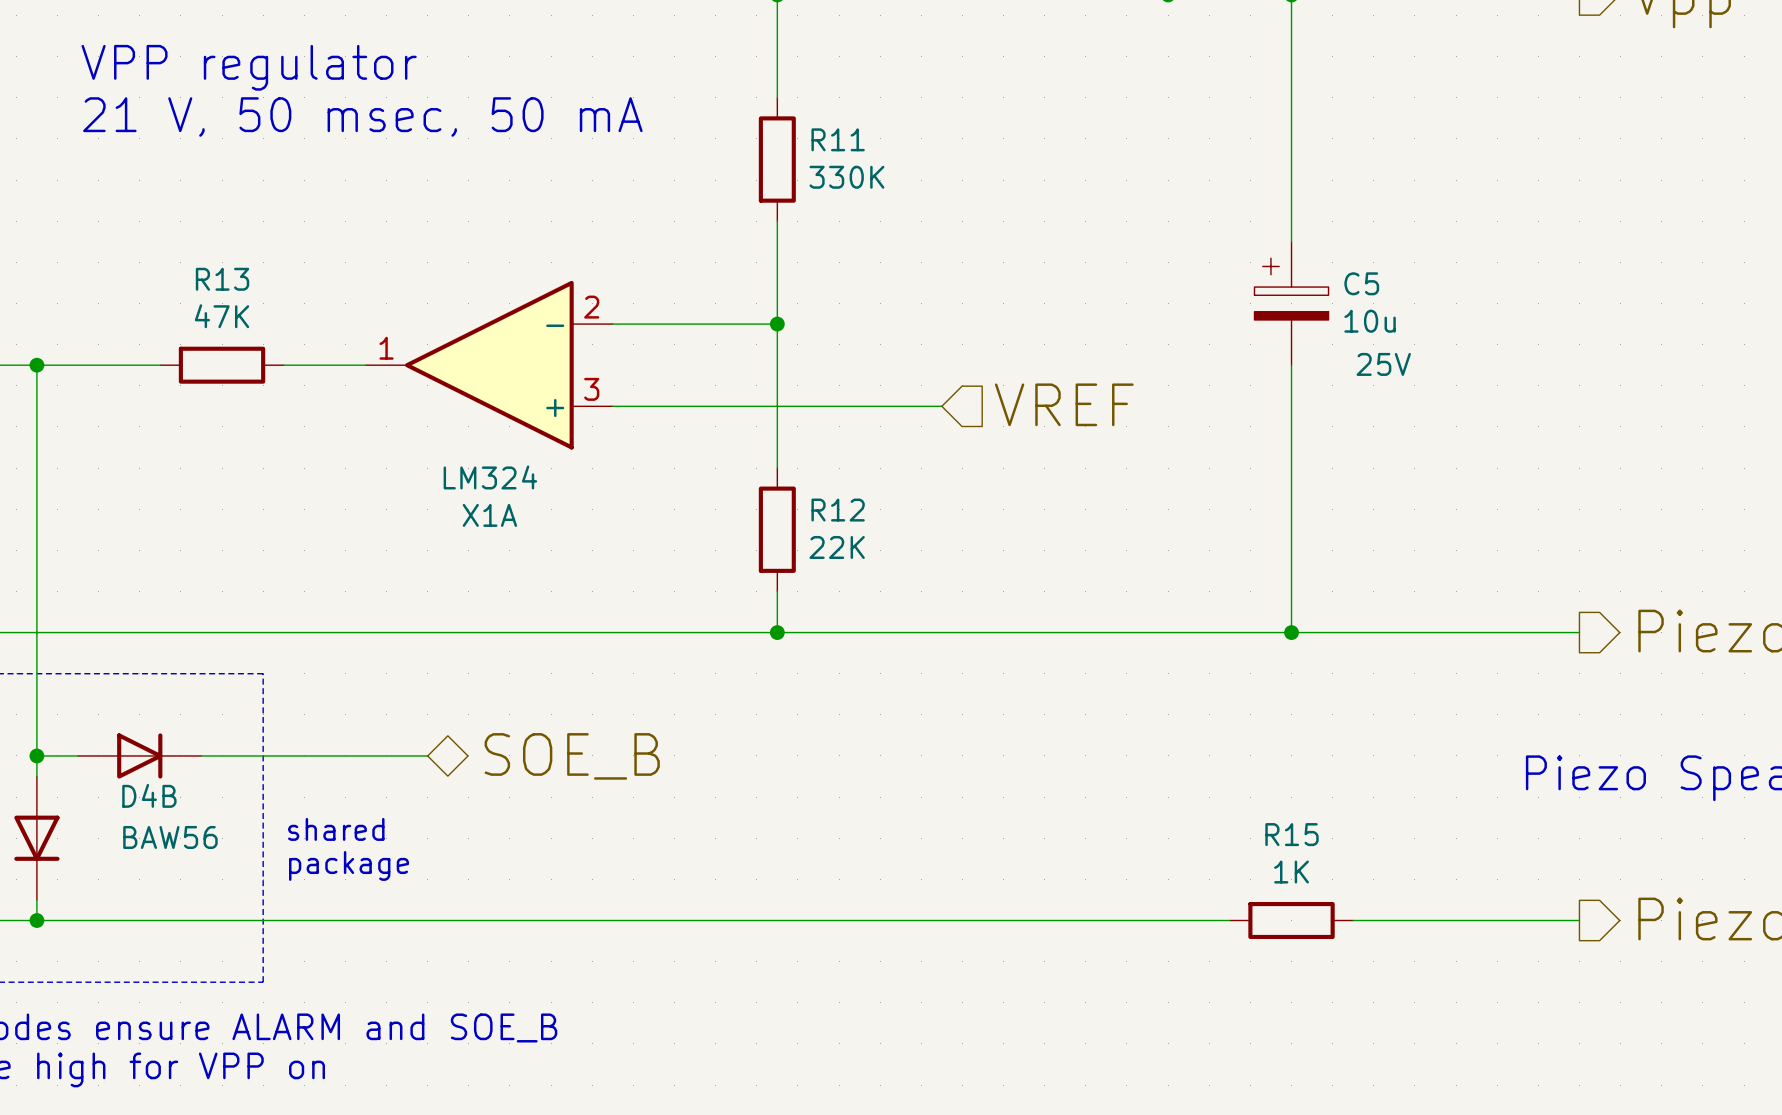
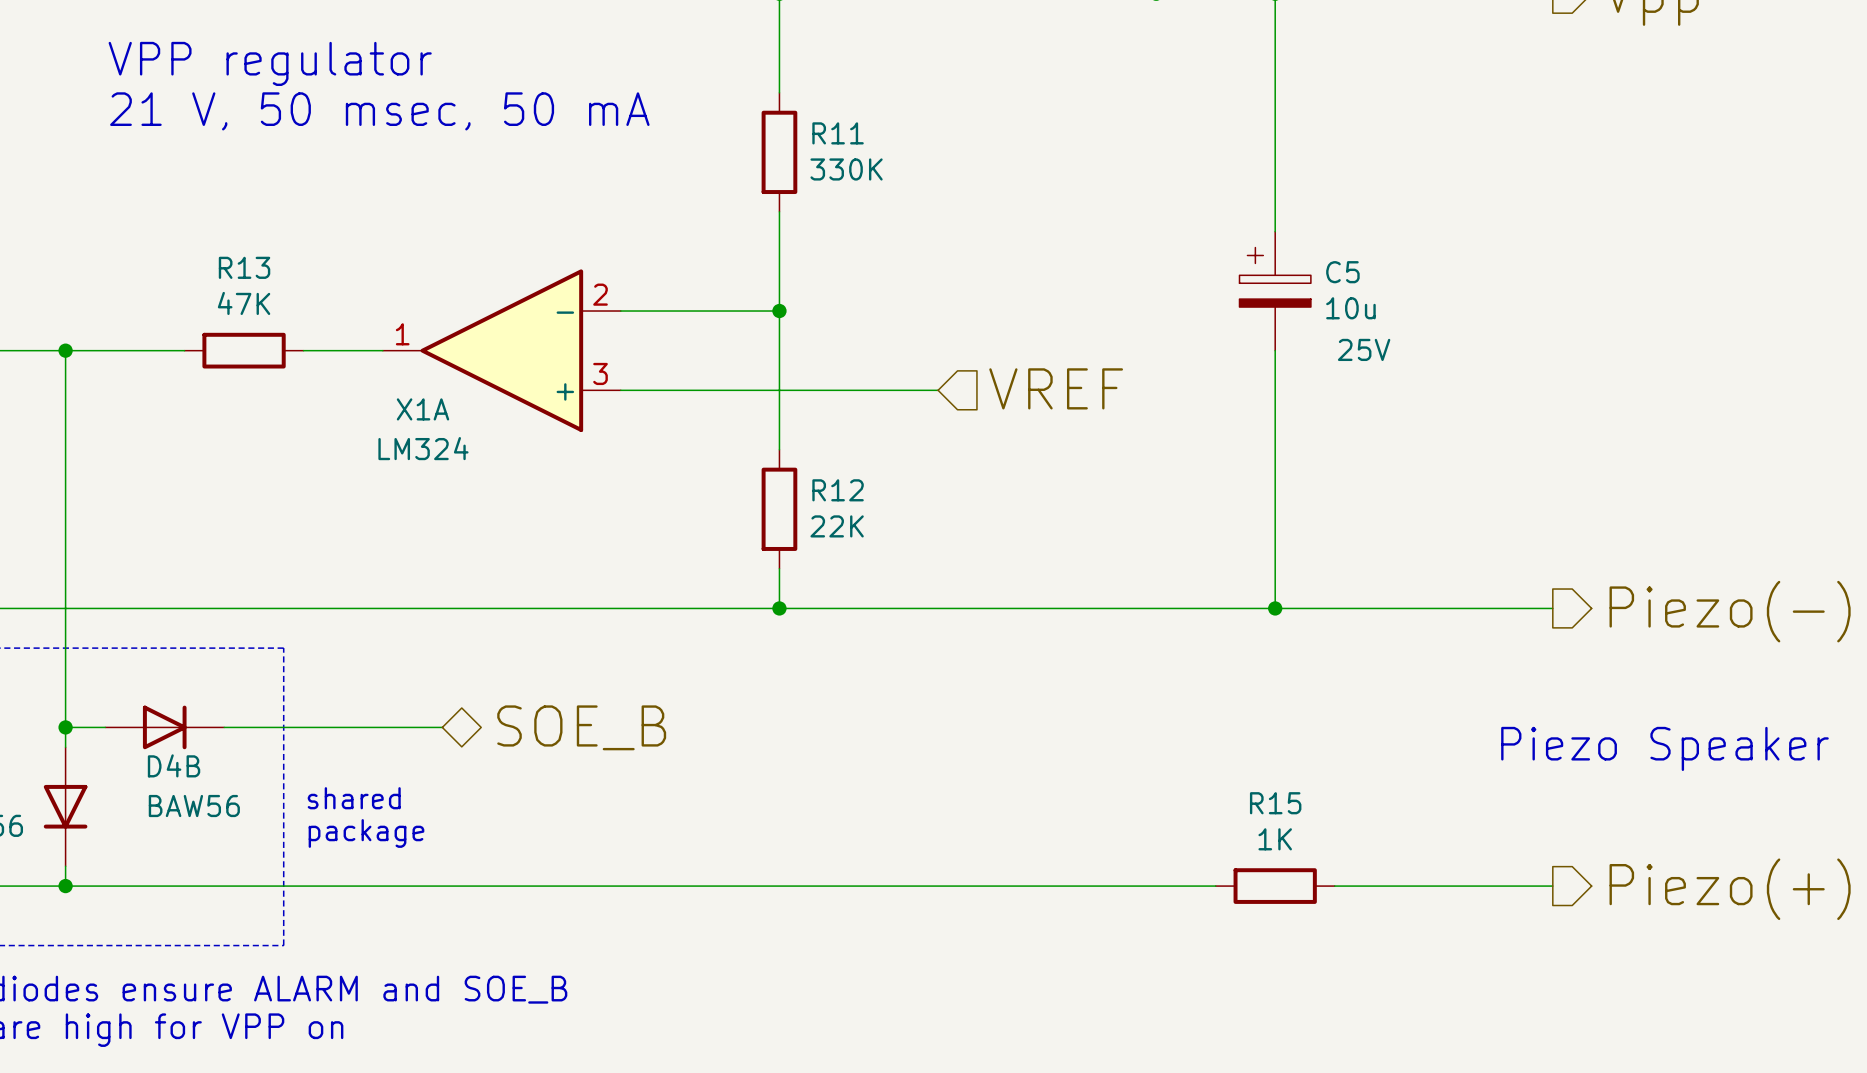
X1A value position: LM324 (490, 477) -> LM324 (423, 448)
X1A name position: X1A (489, 515) -> X1A (422, 409)

